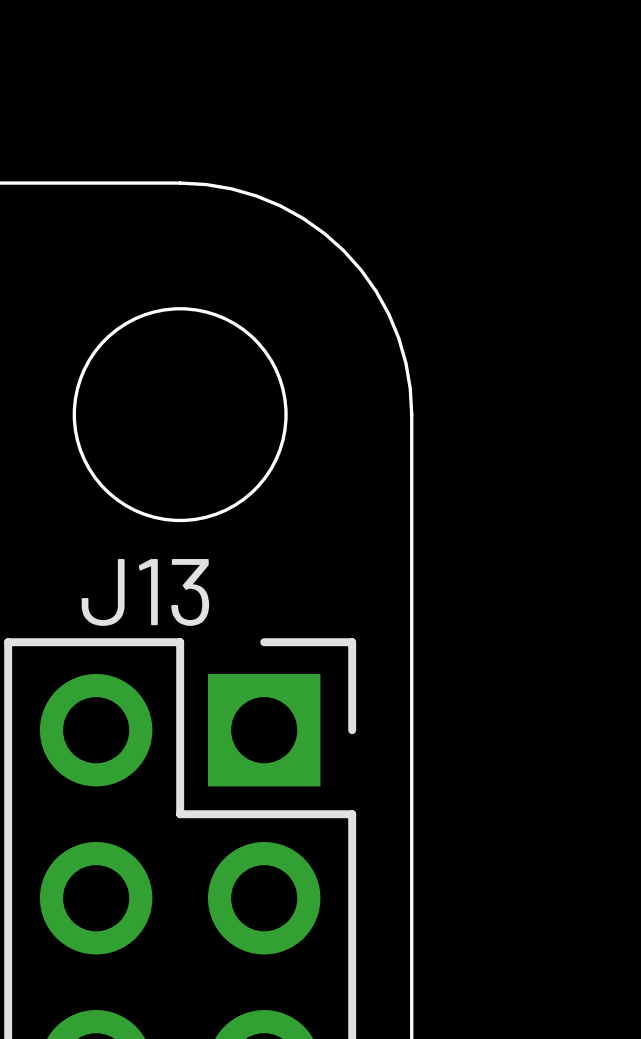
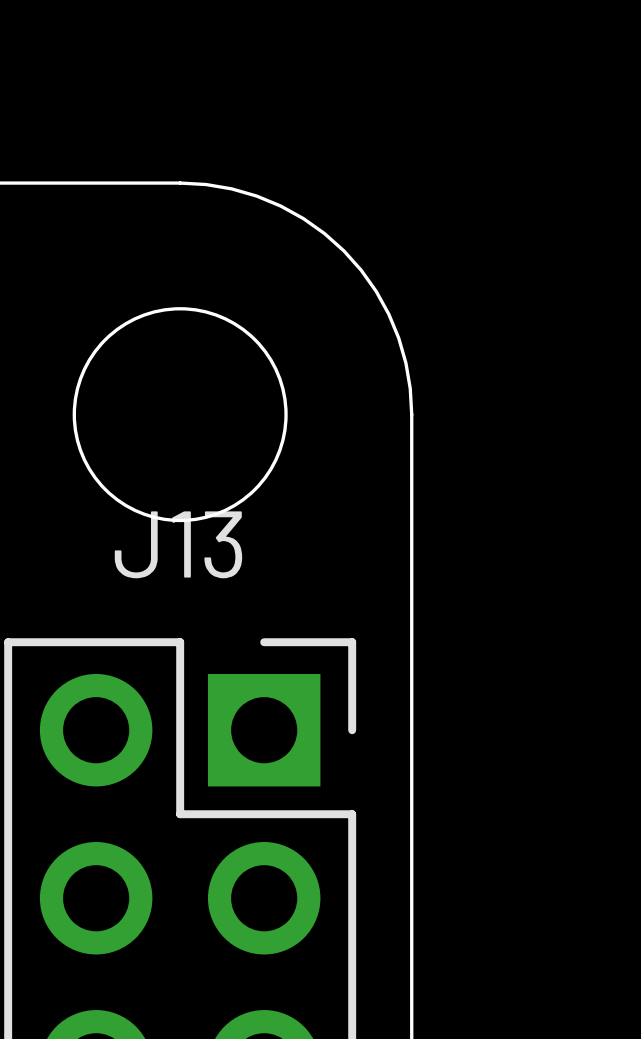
J13 name position: J13 (145, 592) -> J13 (178, 544)

